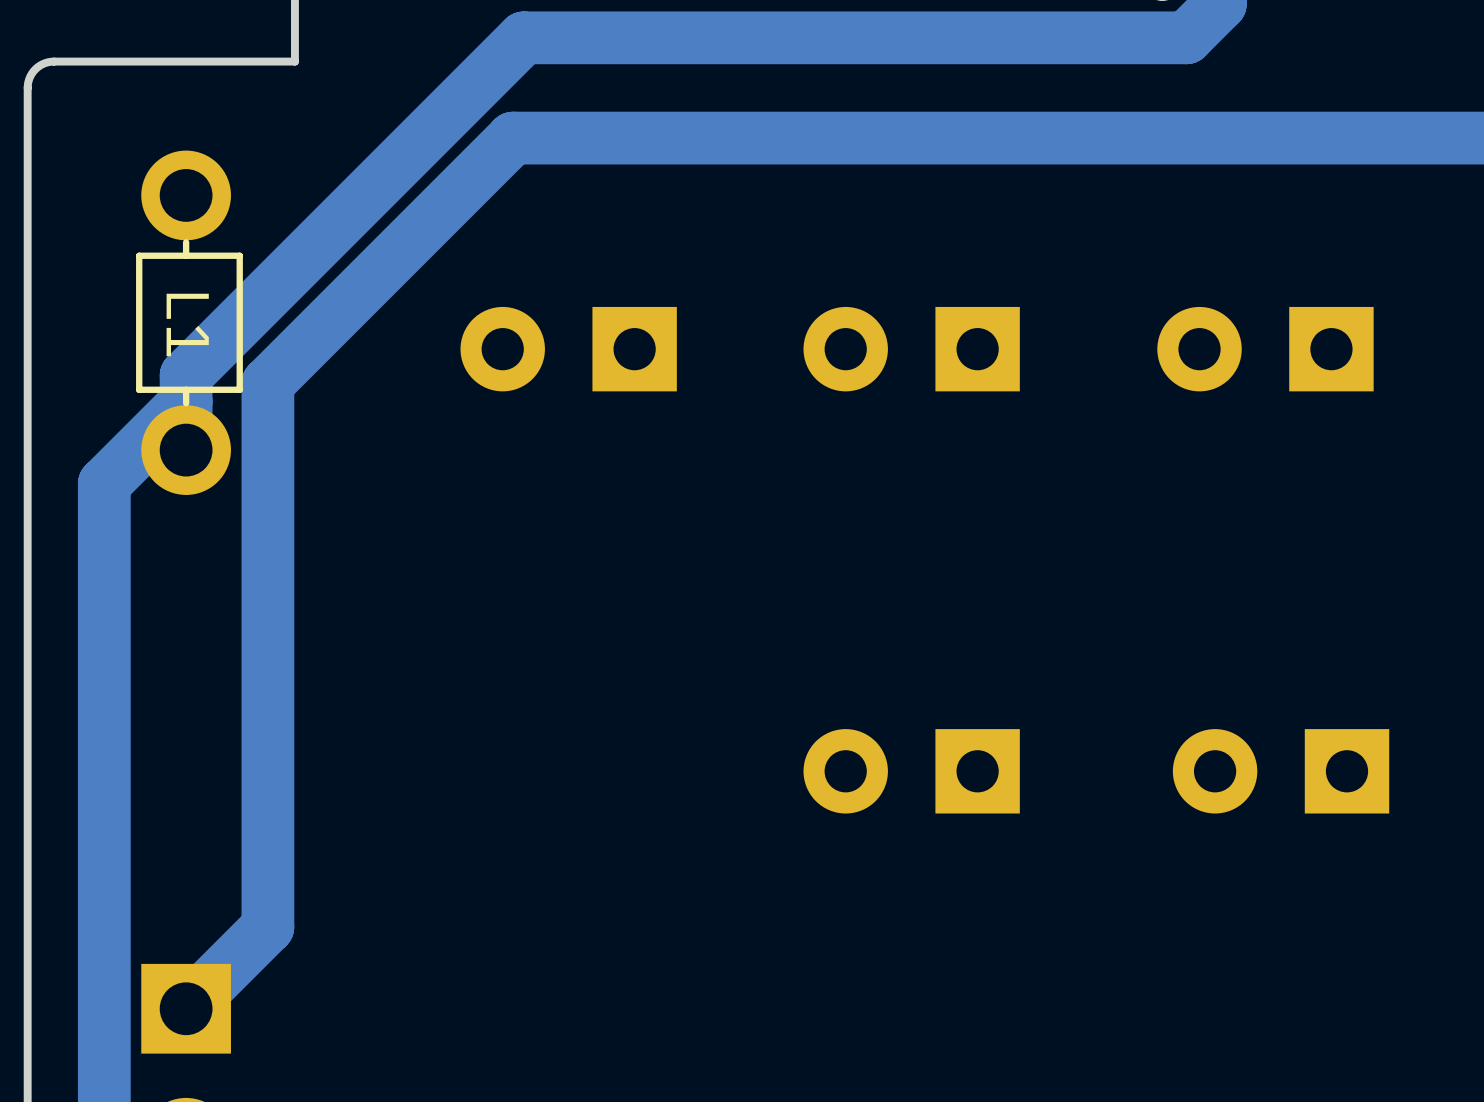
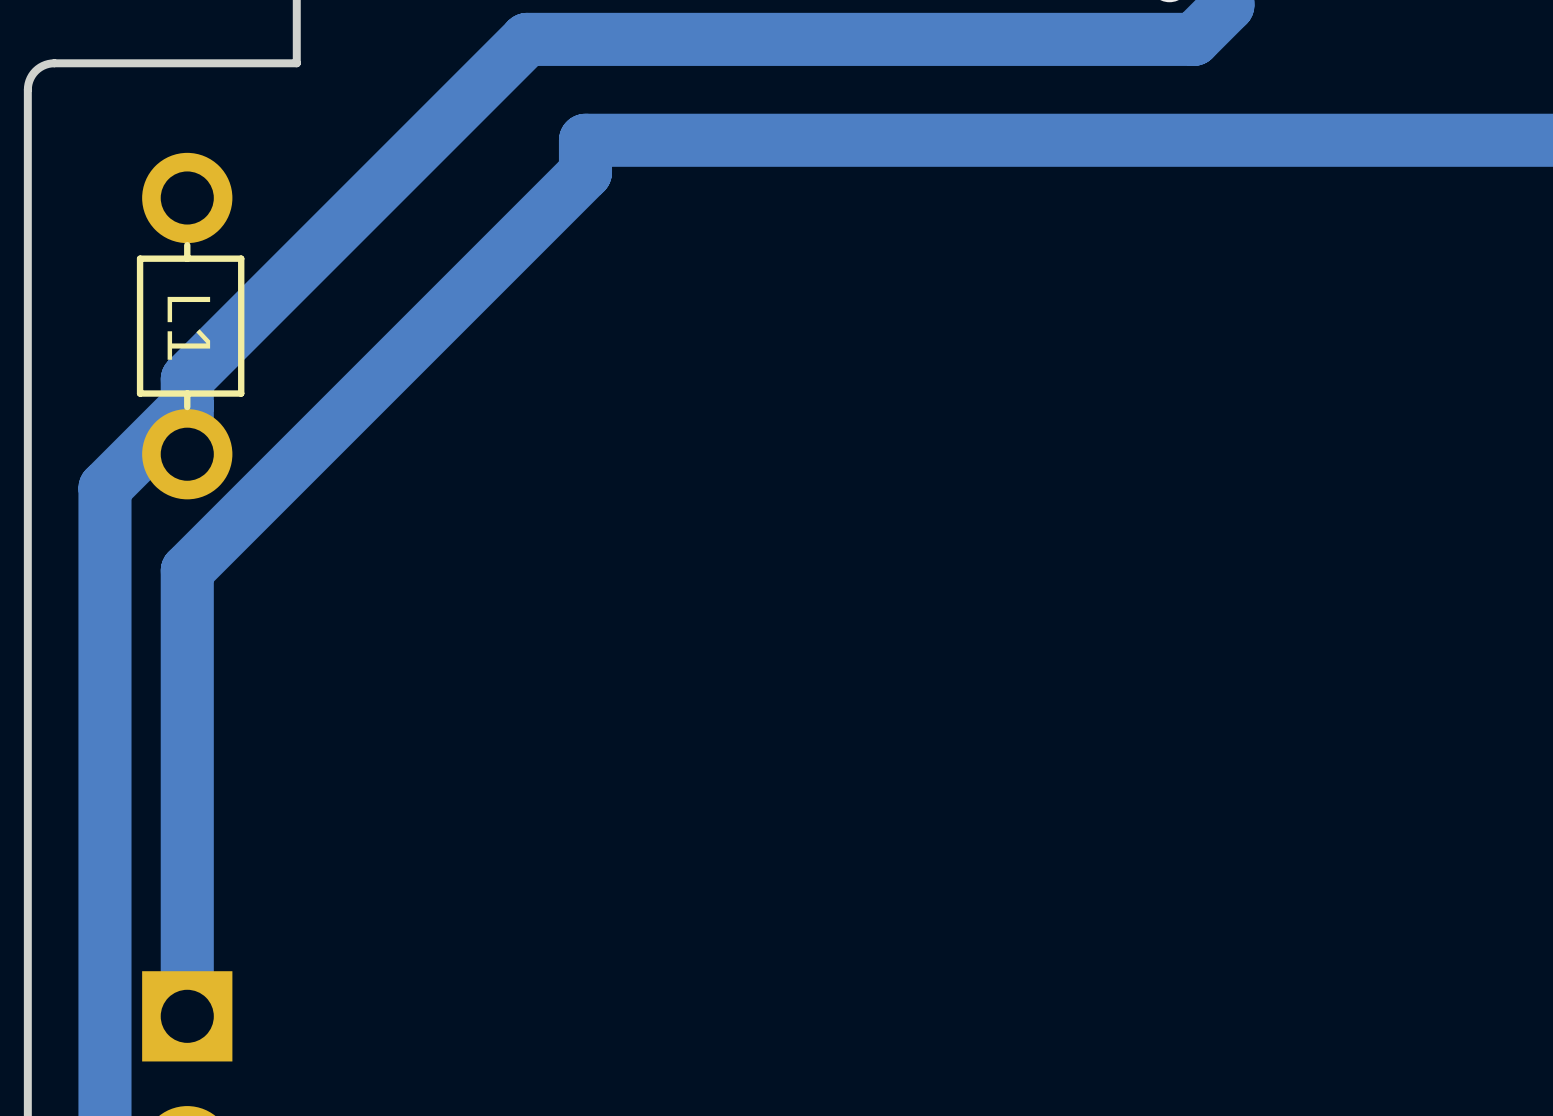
track: (581, 138) (513, 138) (267, 383) (267, 926) (186, 1008) -> (585, 140) (585, 172) (187, 570) (187, 1016)
part: (568, 349) -> none
part: (911, 349) -> none
part: (1265, 349) -> none
part: (911, 771) -> none
part: (1281, 771) -> none

